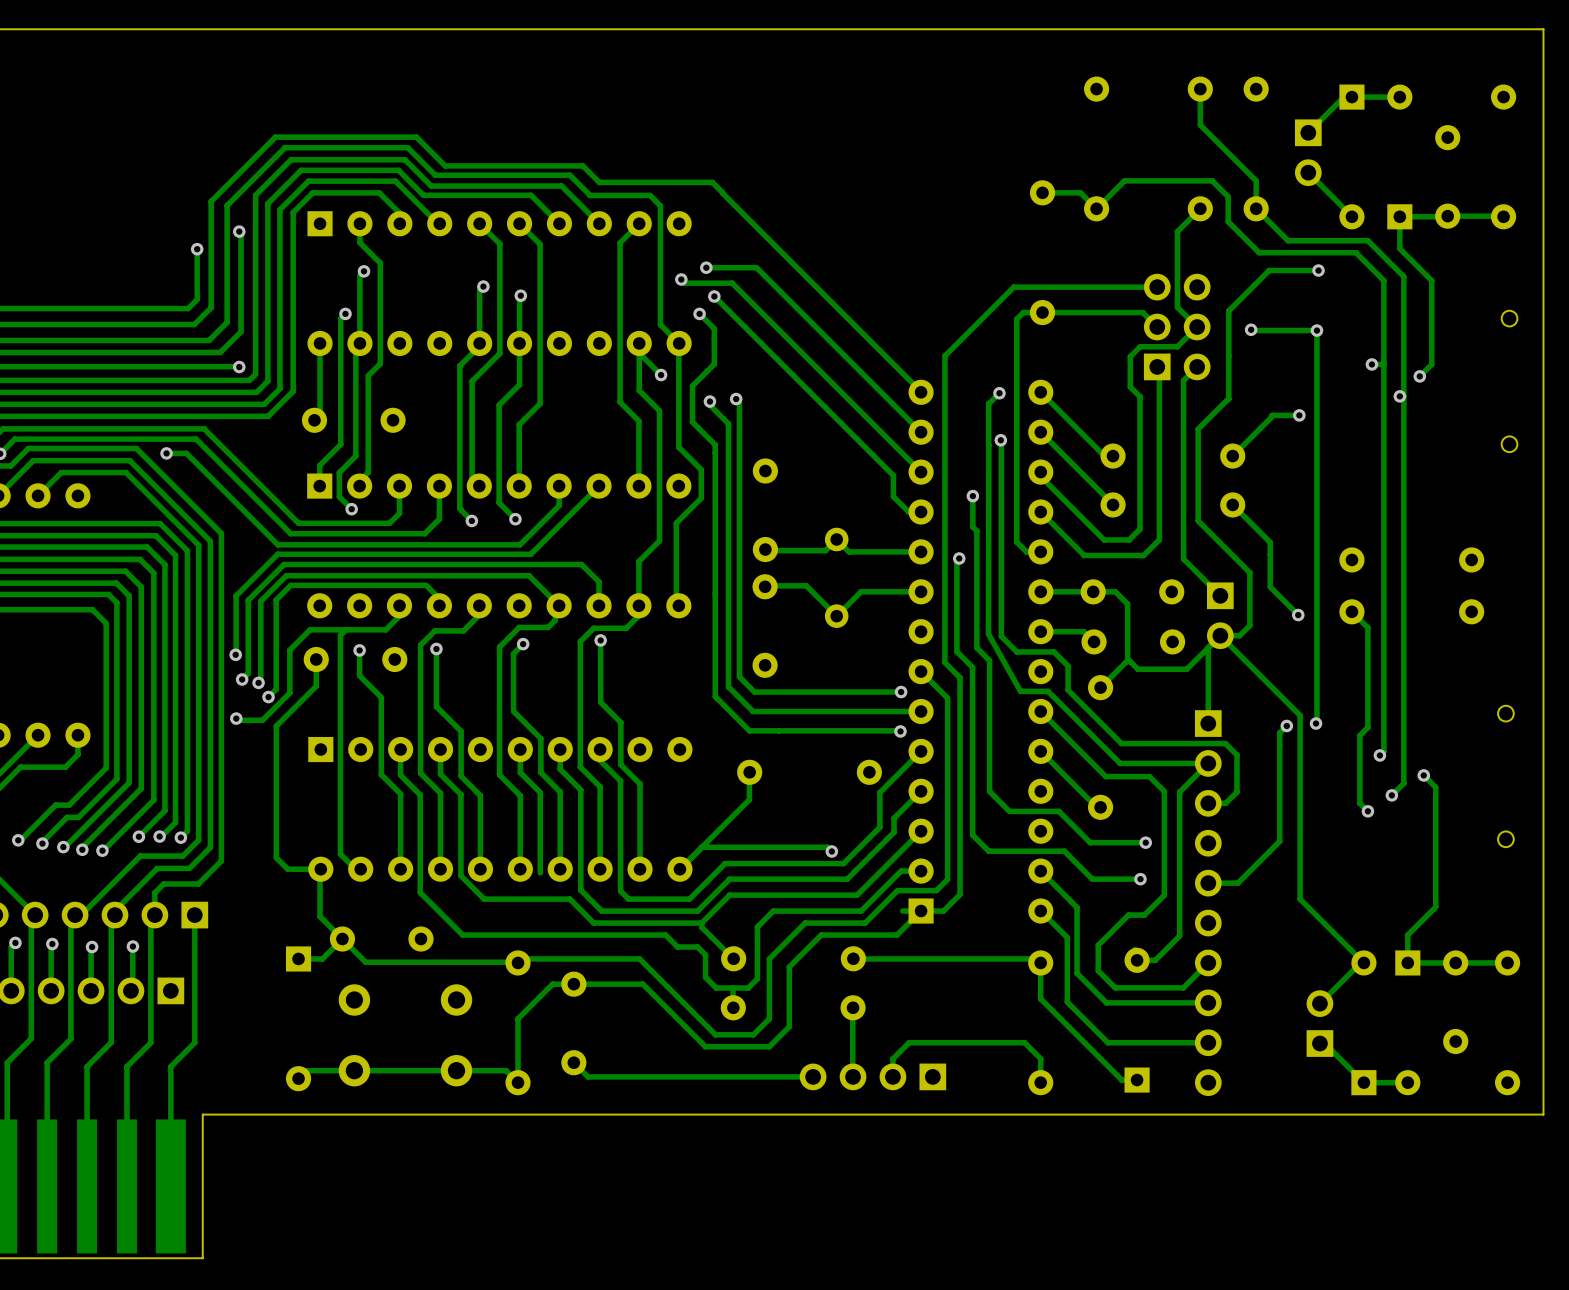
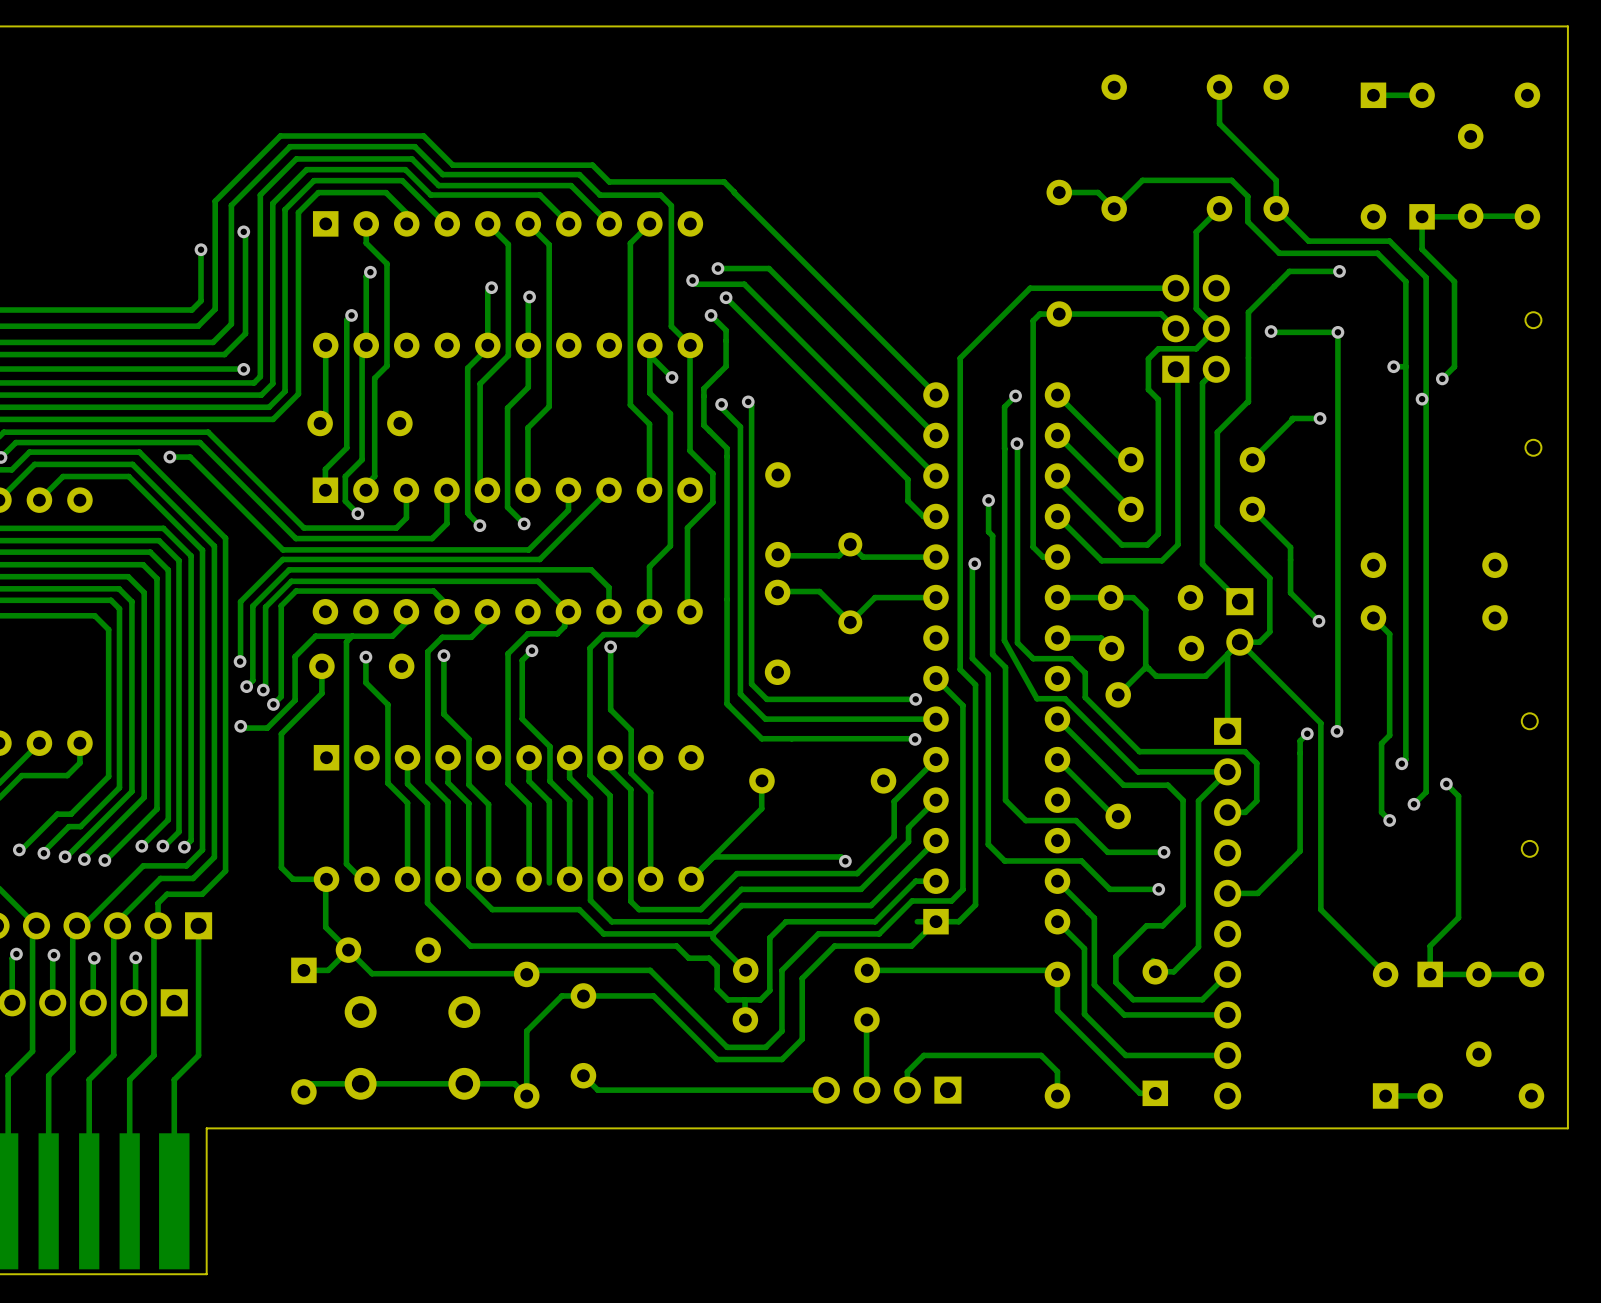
track: (1351, 97) (1344, 97) (1308, 132) -> none
part: (1308, 152) -> none
track: (1308, 172) (1351, 216) -> none
track: (1363, 962) (1360, 962) (1319, 1003) -> none
part: (1319, 1023) -> none
track: (1319, 1043) (1324, 1043) (1363, 1082) -> none

